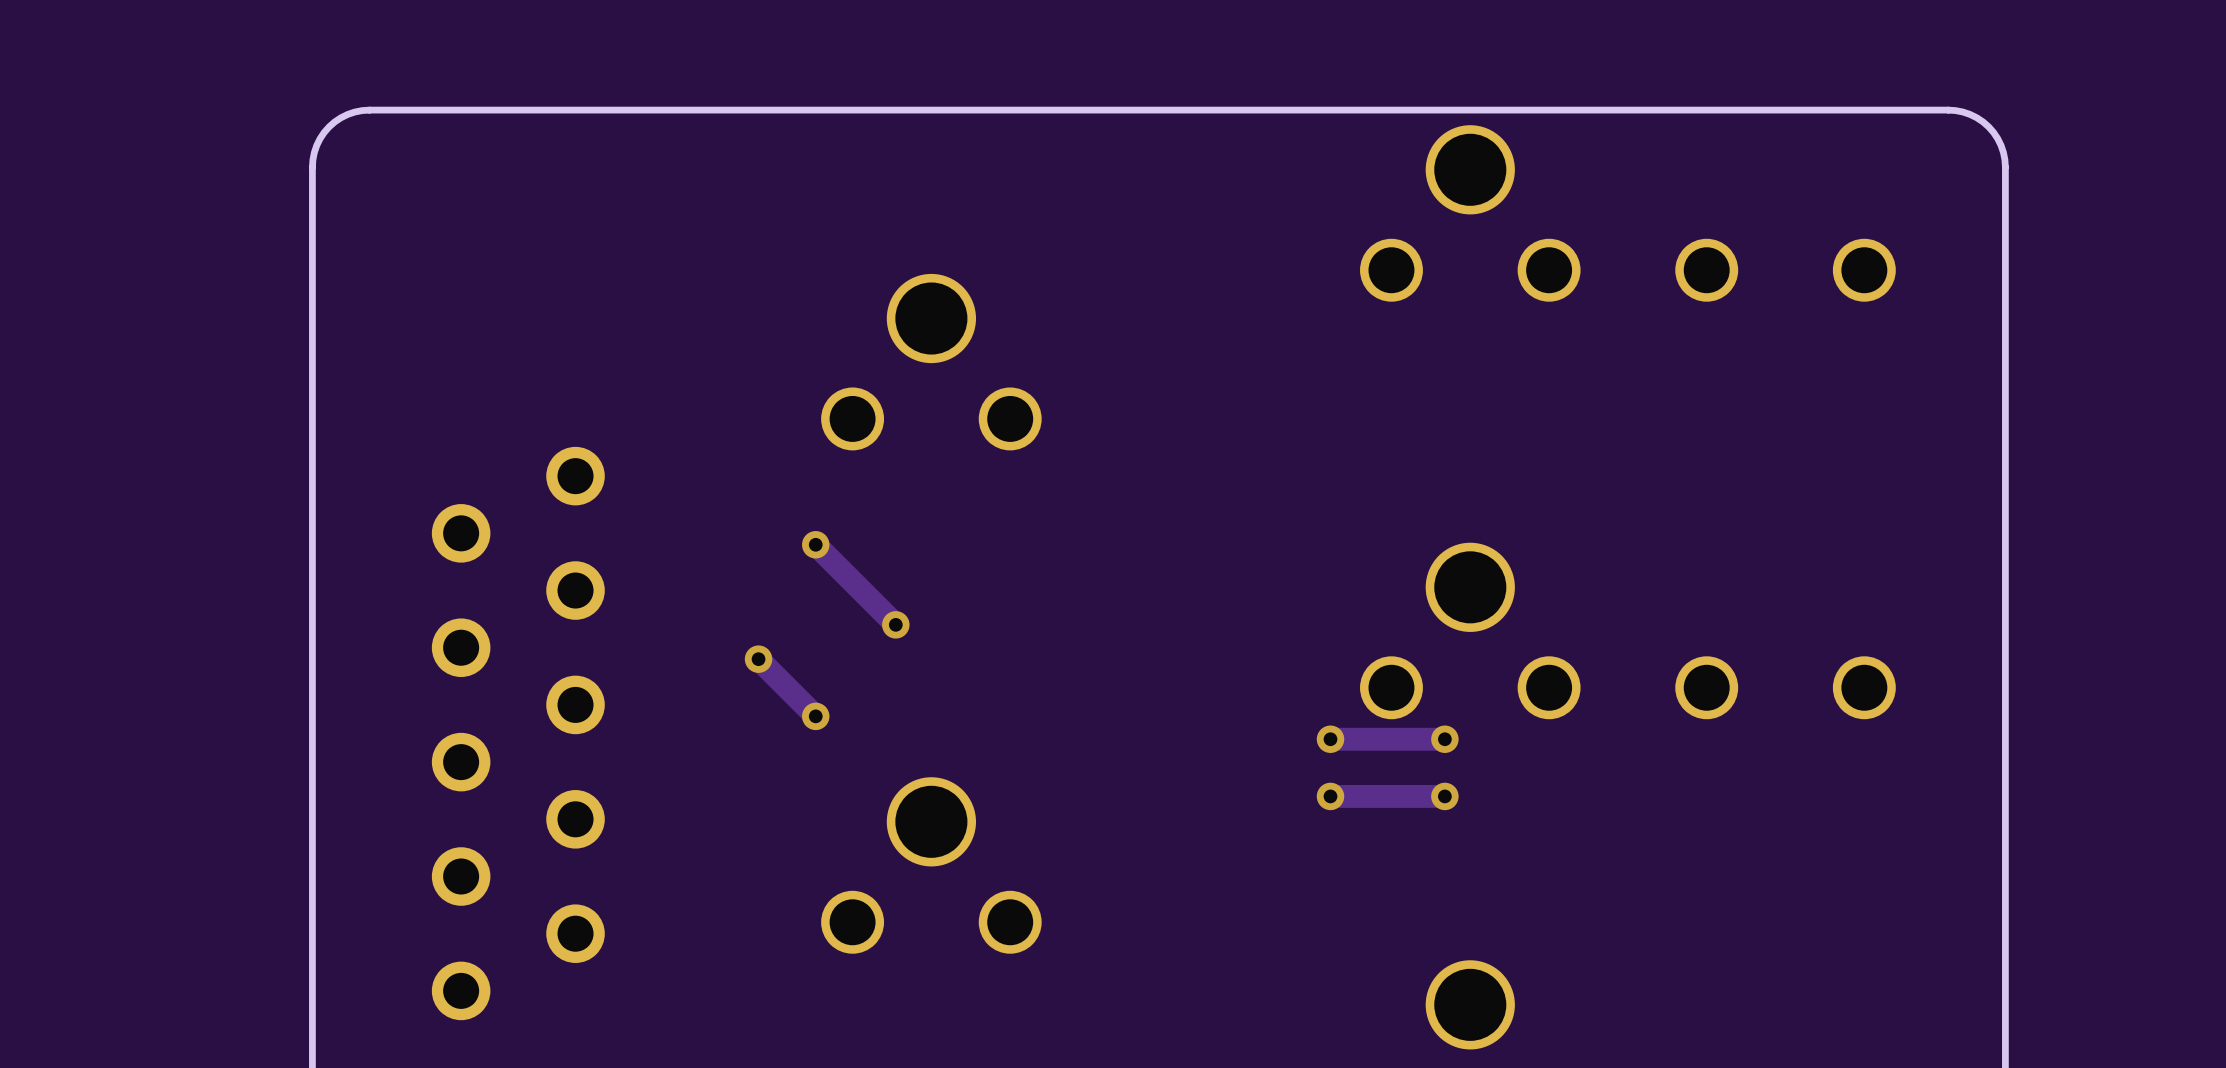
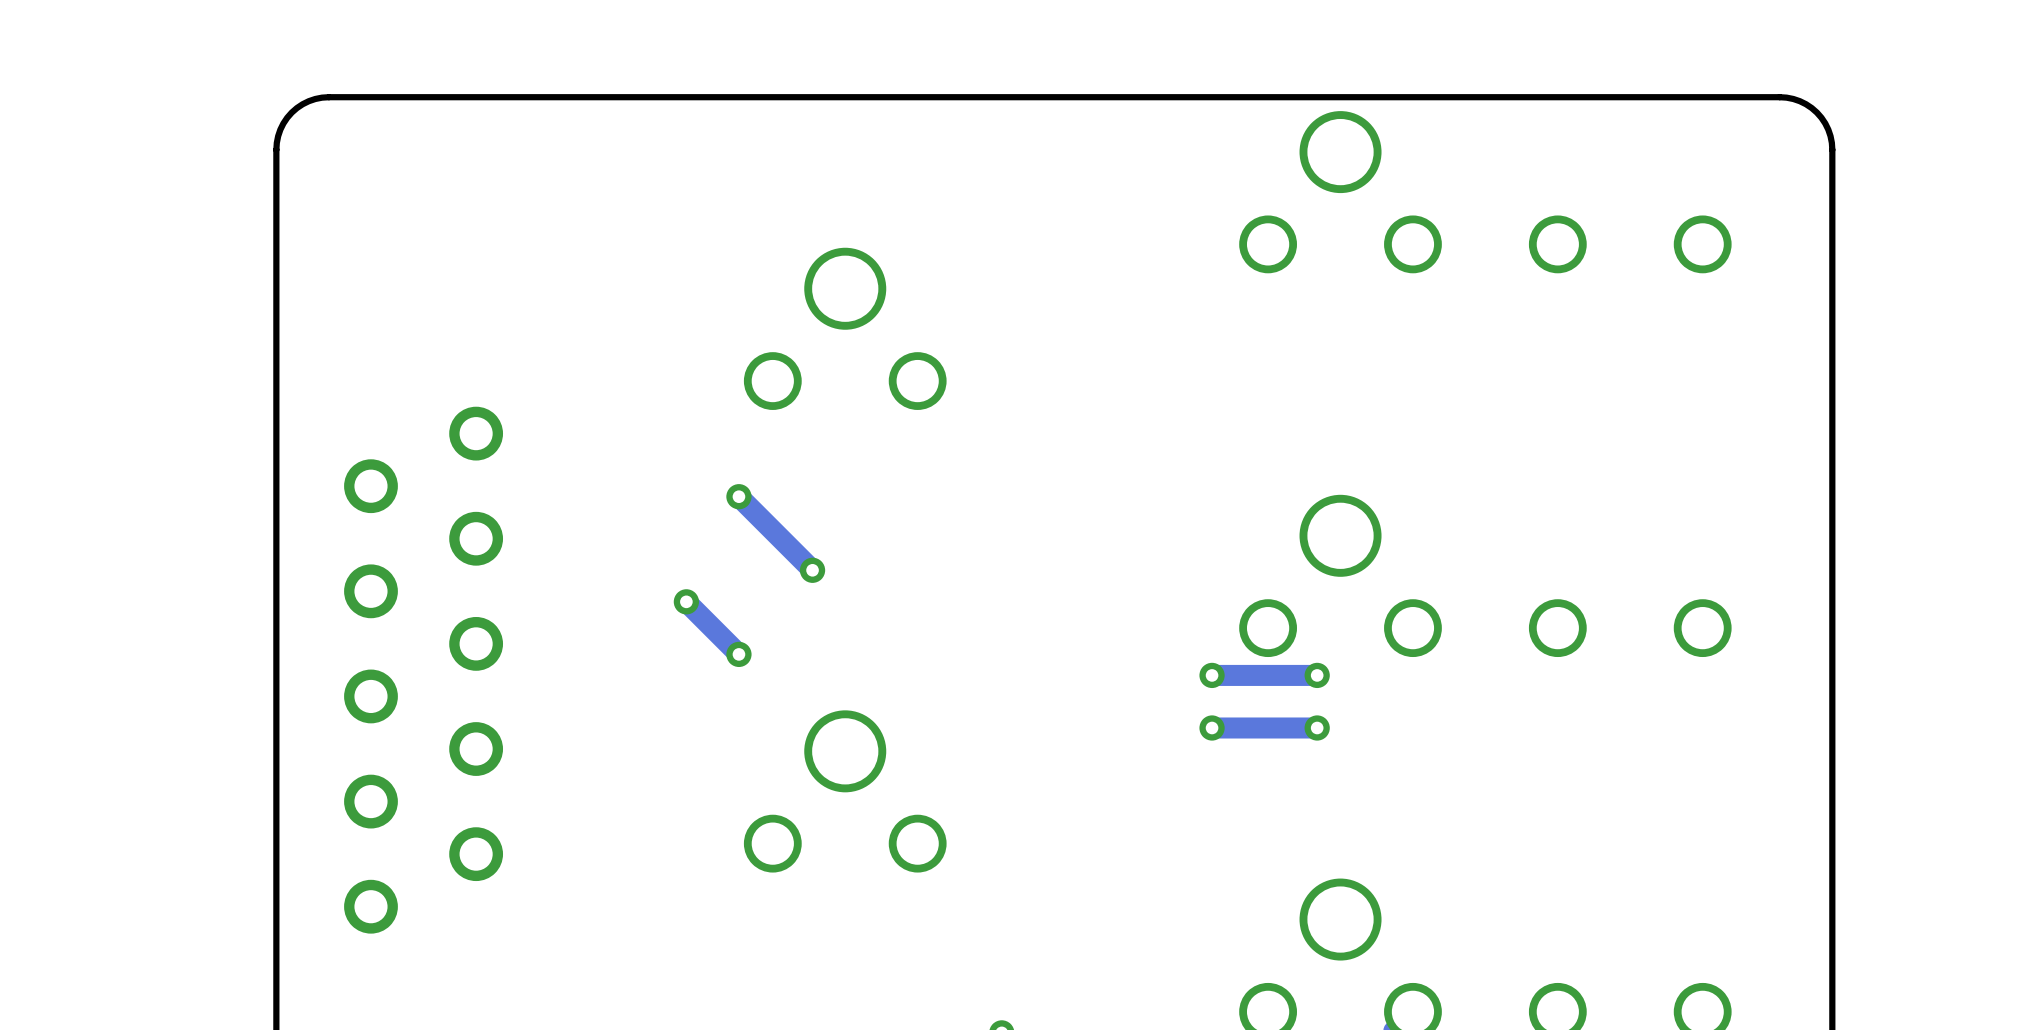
part position: (518, 733) -> (423, 670)

